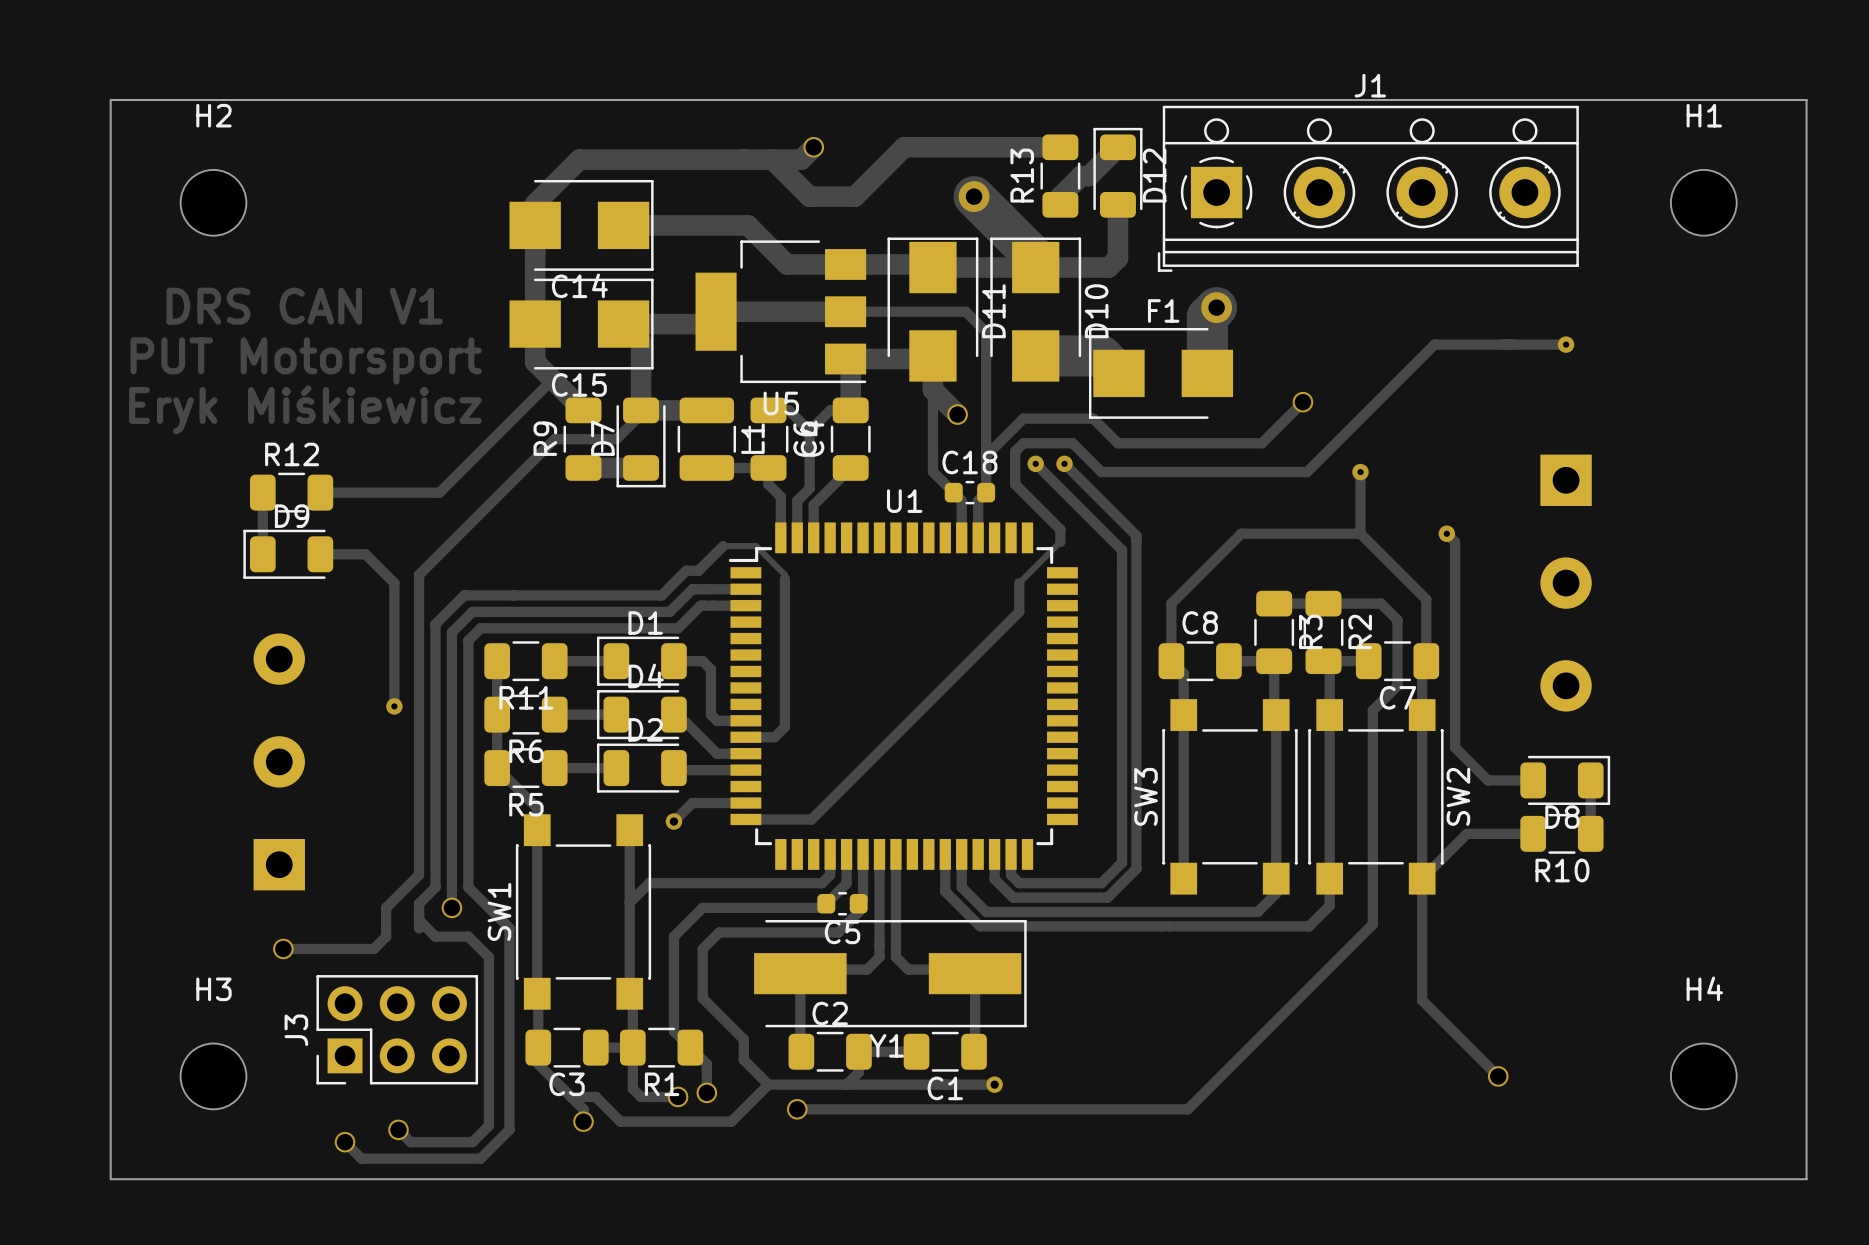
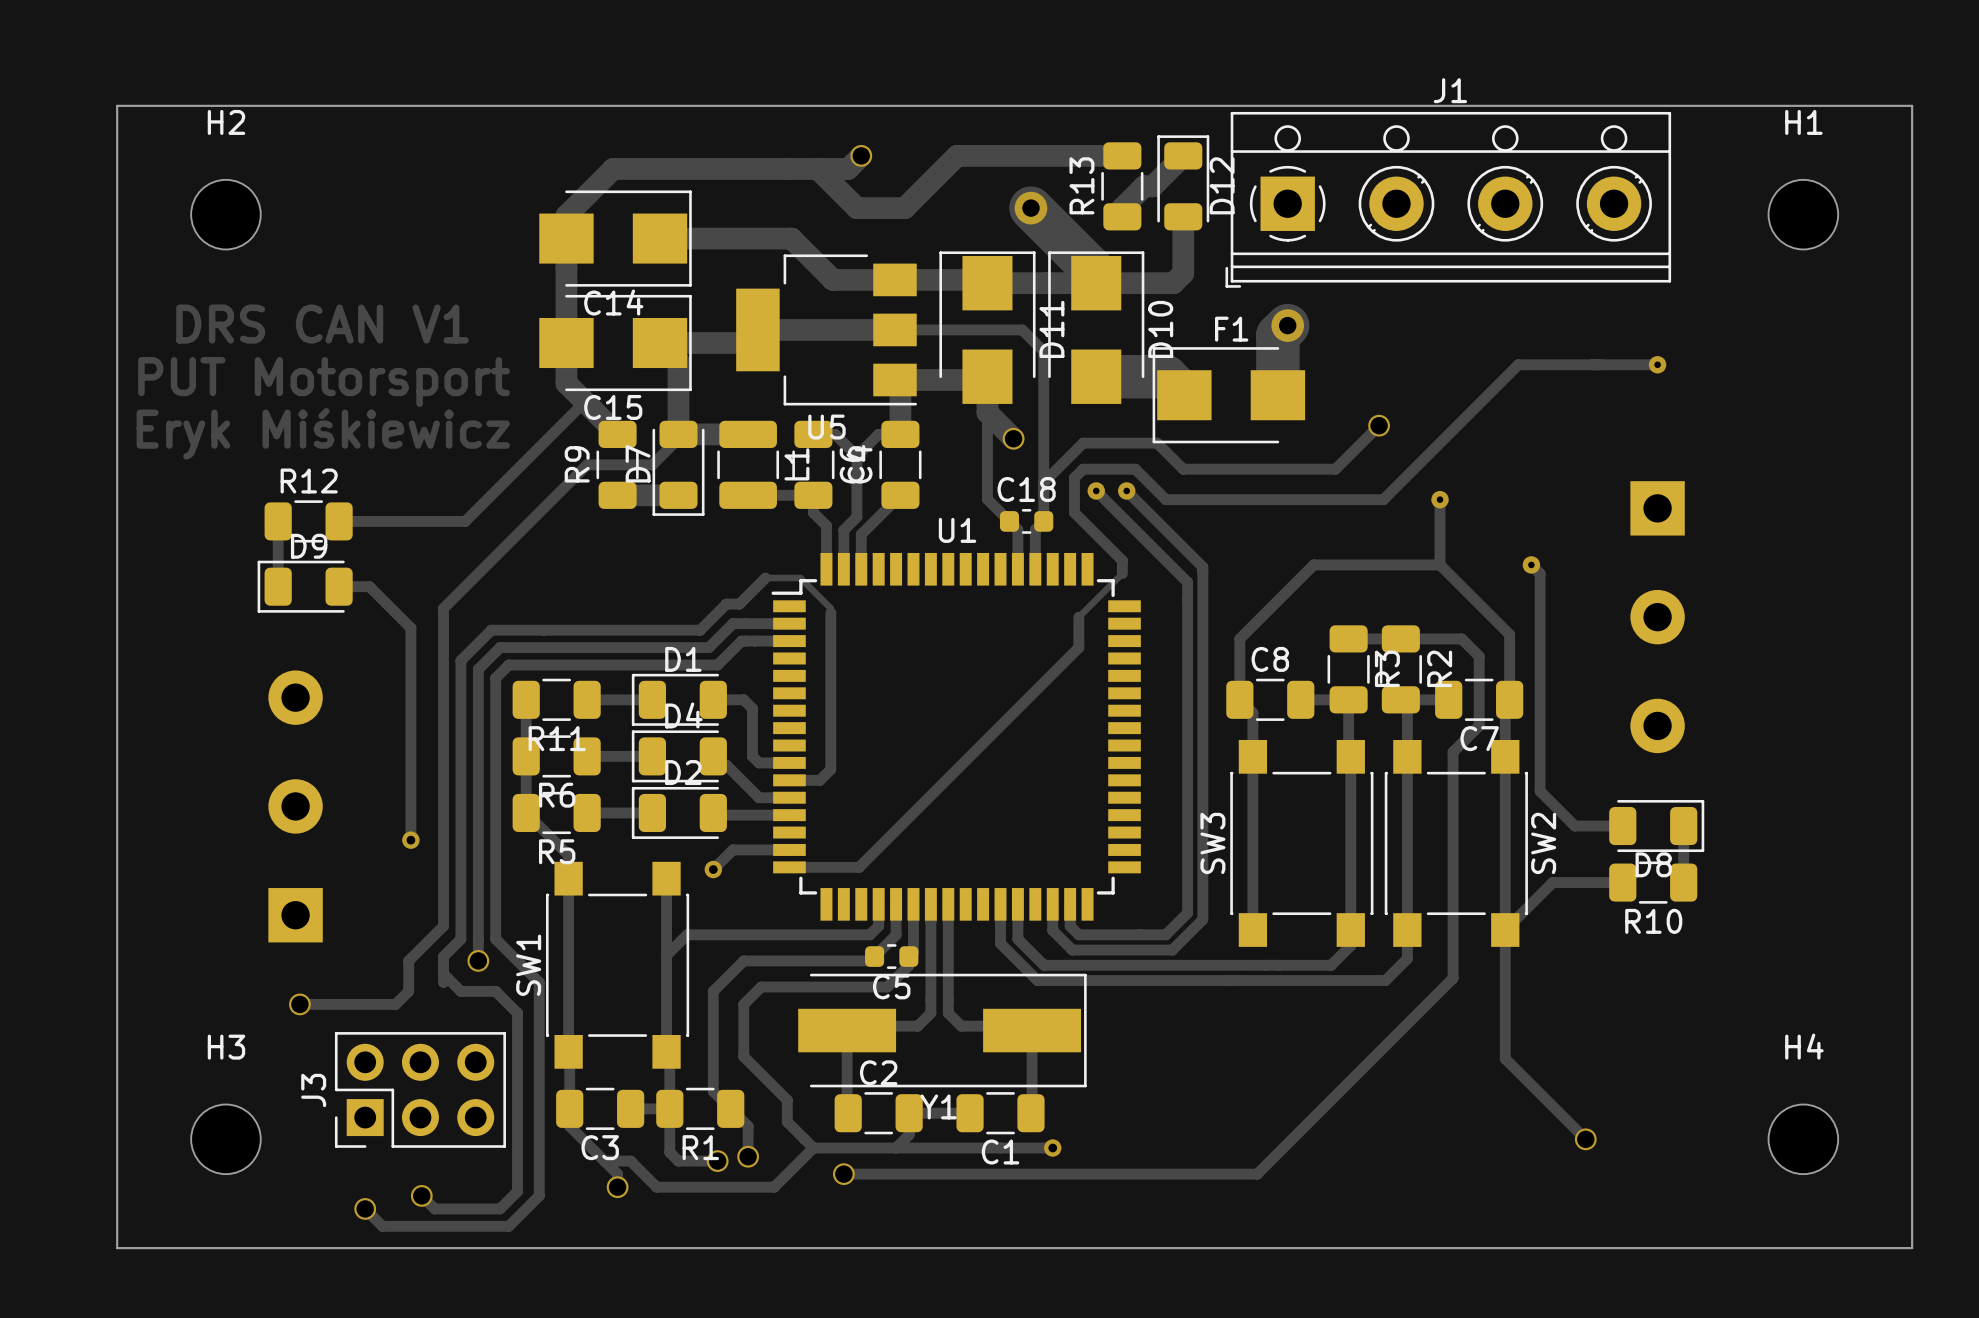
track: (349, 554) (365, 554) (394, 583) (394, 706) -> (369, 586) (410, 628) (410, 840)
via: (394, 706) -> none
via: none -> (410, 840)

